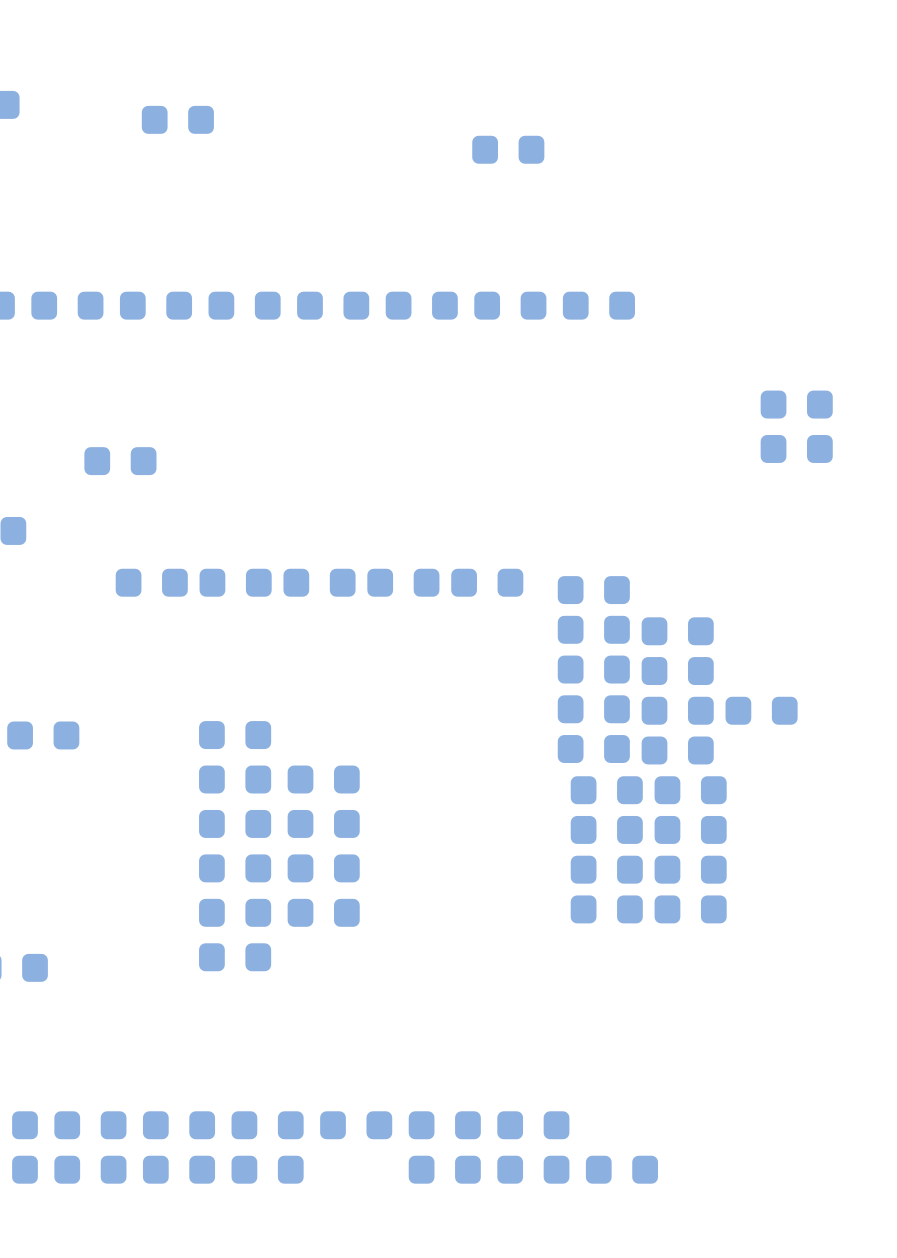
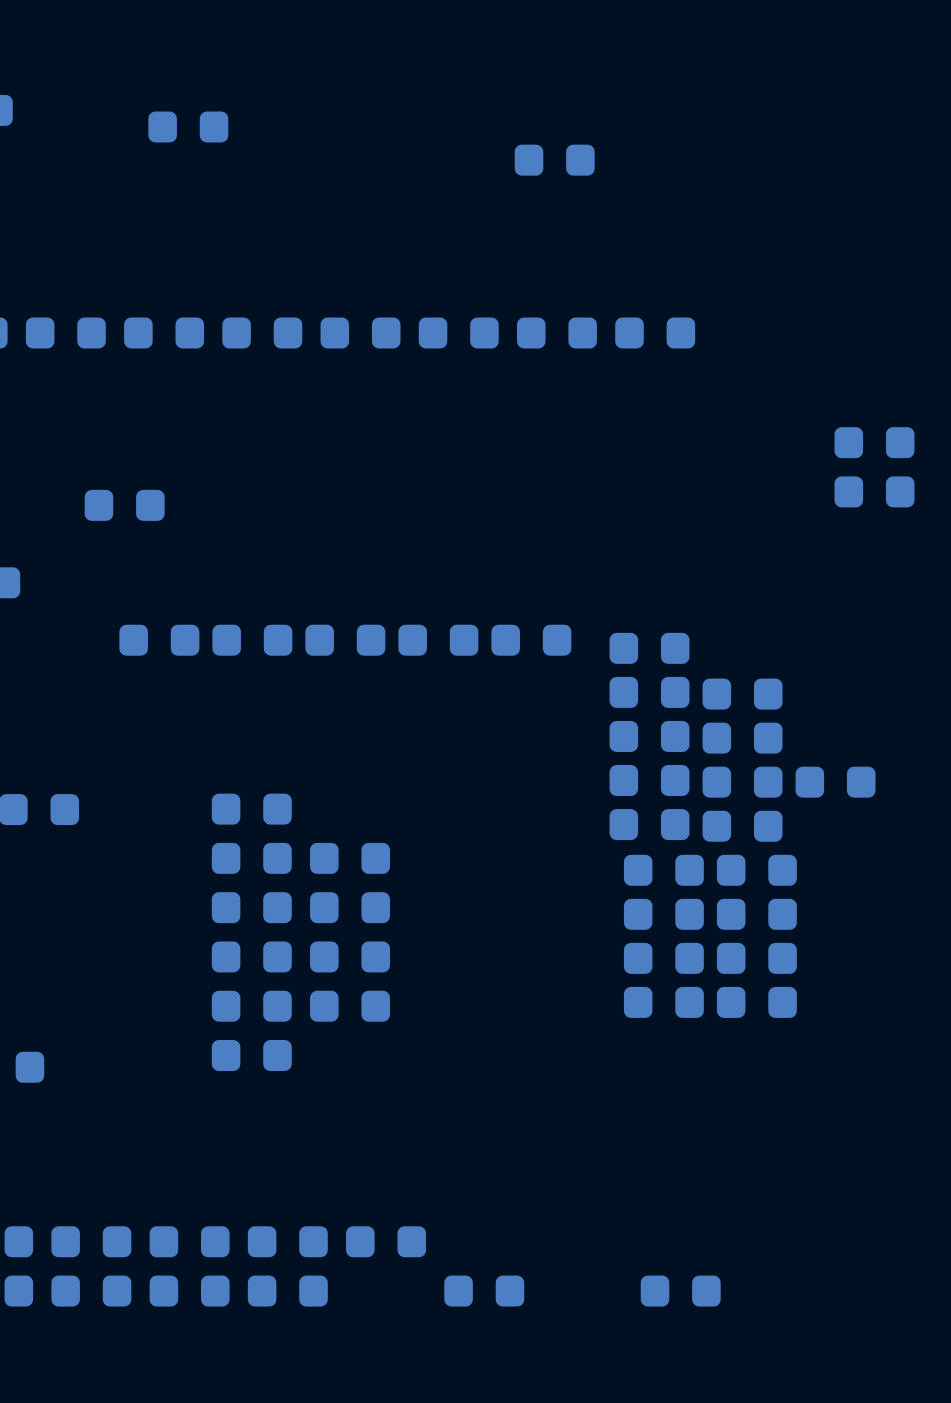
part: (444, 1125) -> none
part: (533, 1125) -> none
part: (533, 1169) -> none

